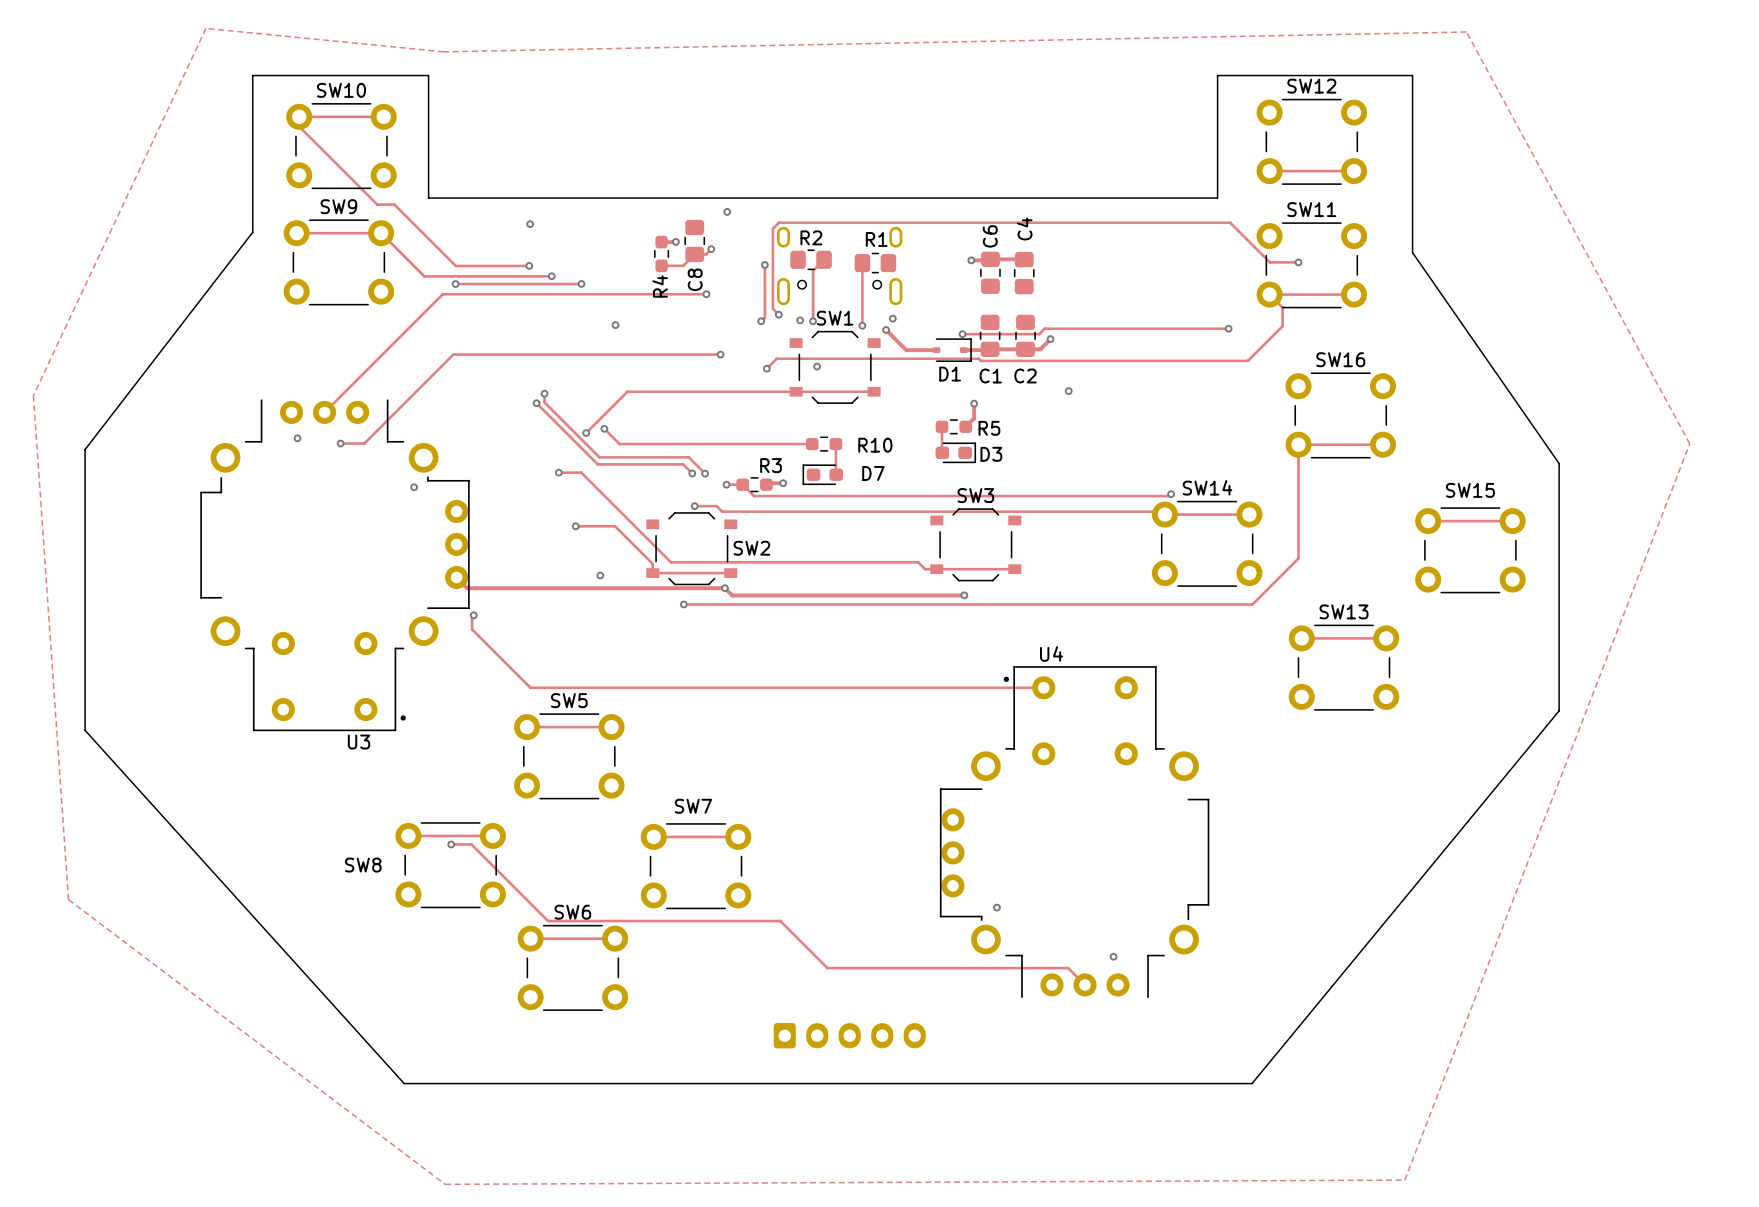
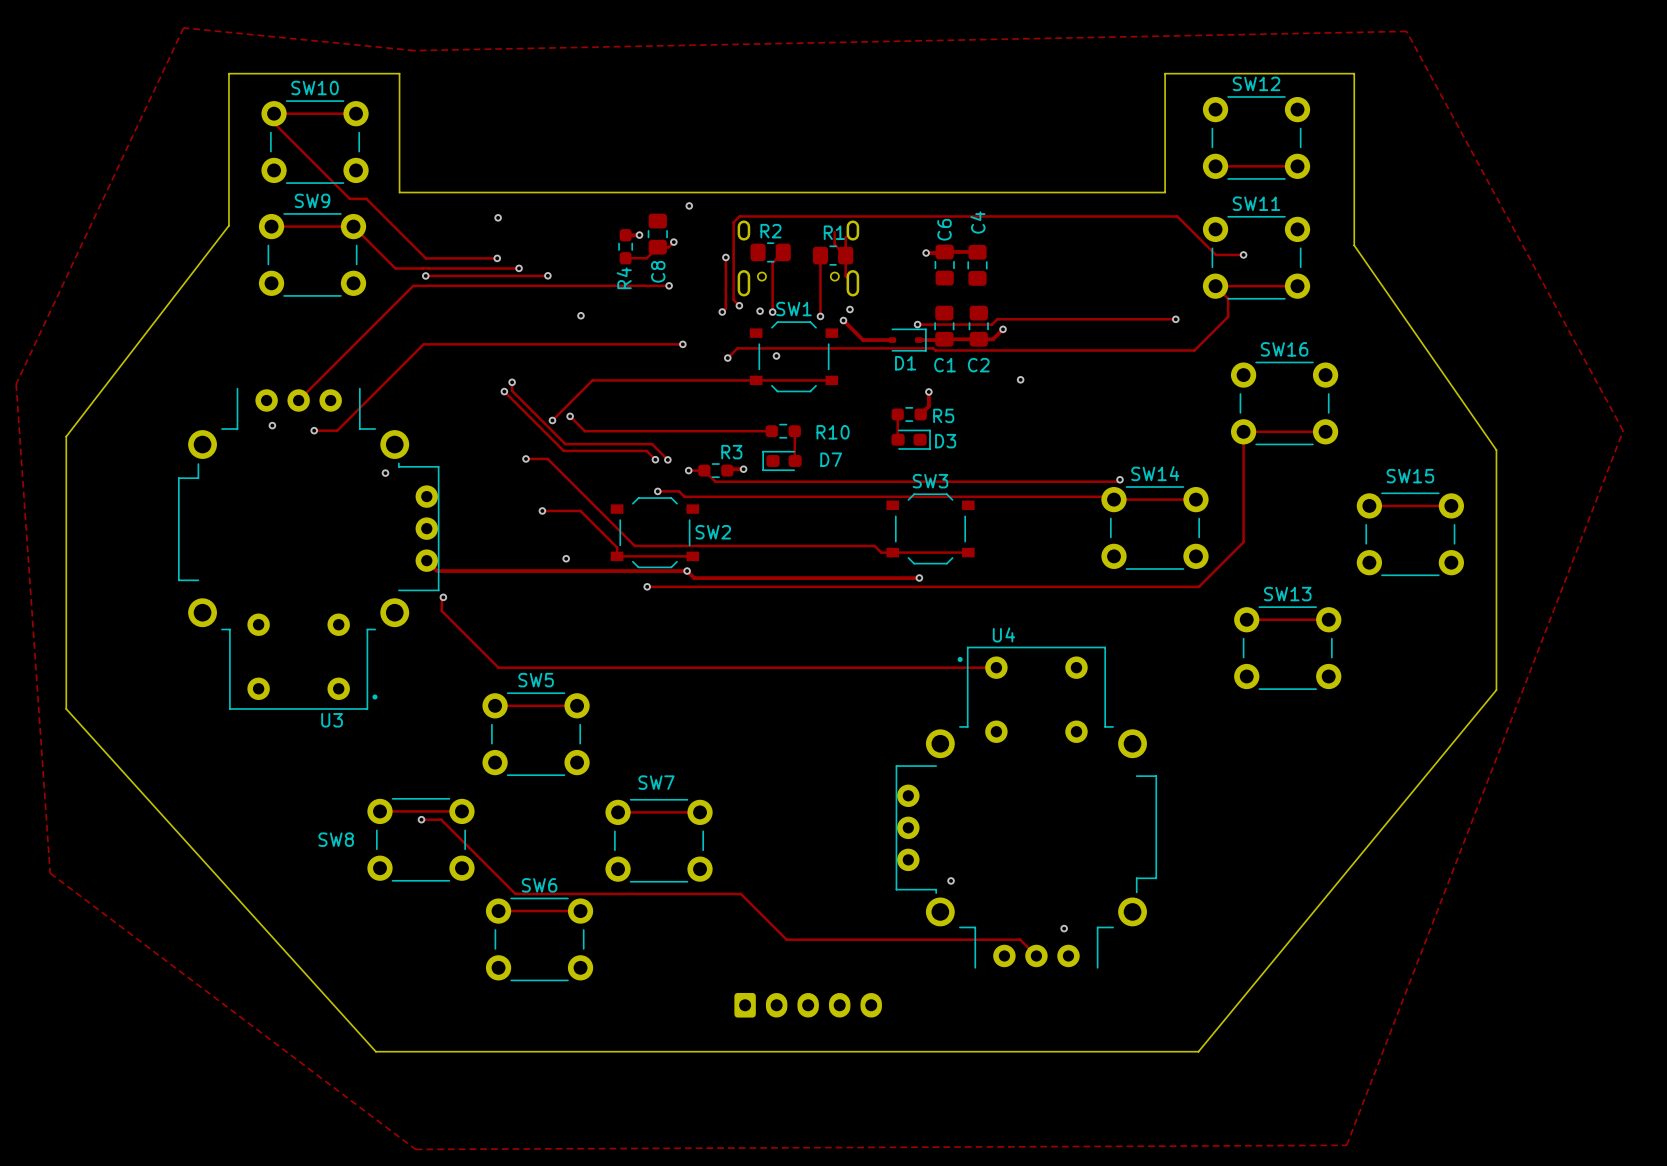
track: none -> (852, 230) (845, 237) (845, 276) (852, 283)
track: none -> (834, 231) (834, 244) (845, 255)

